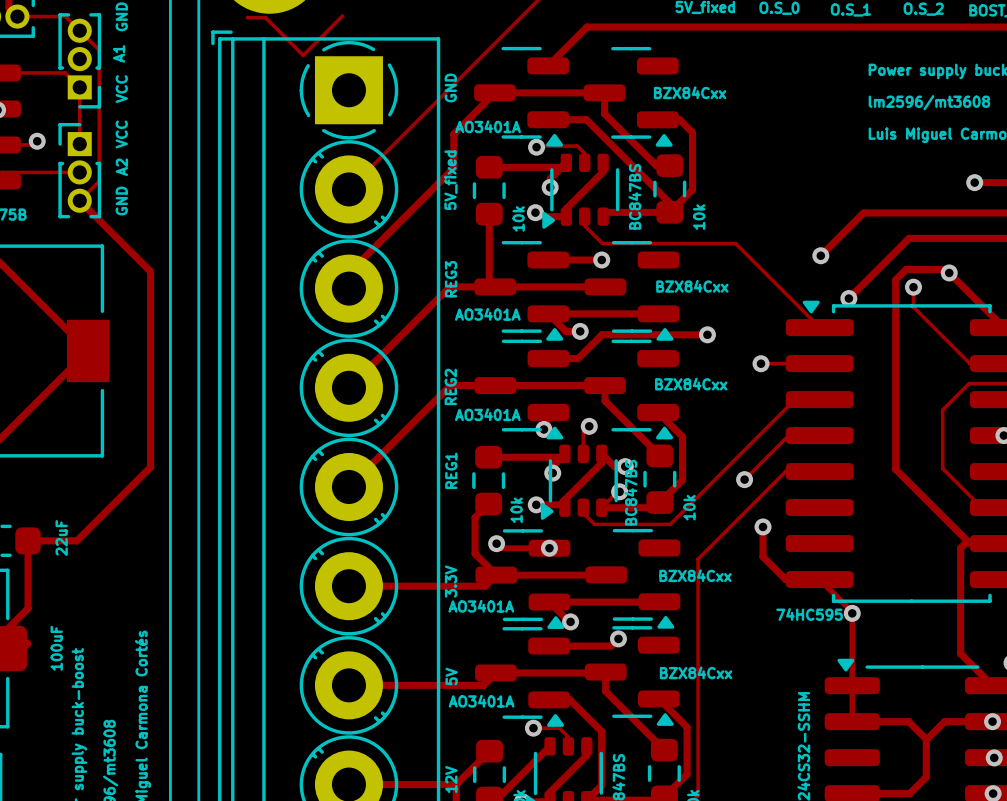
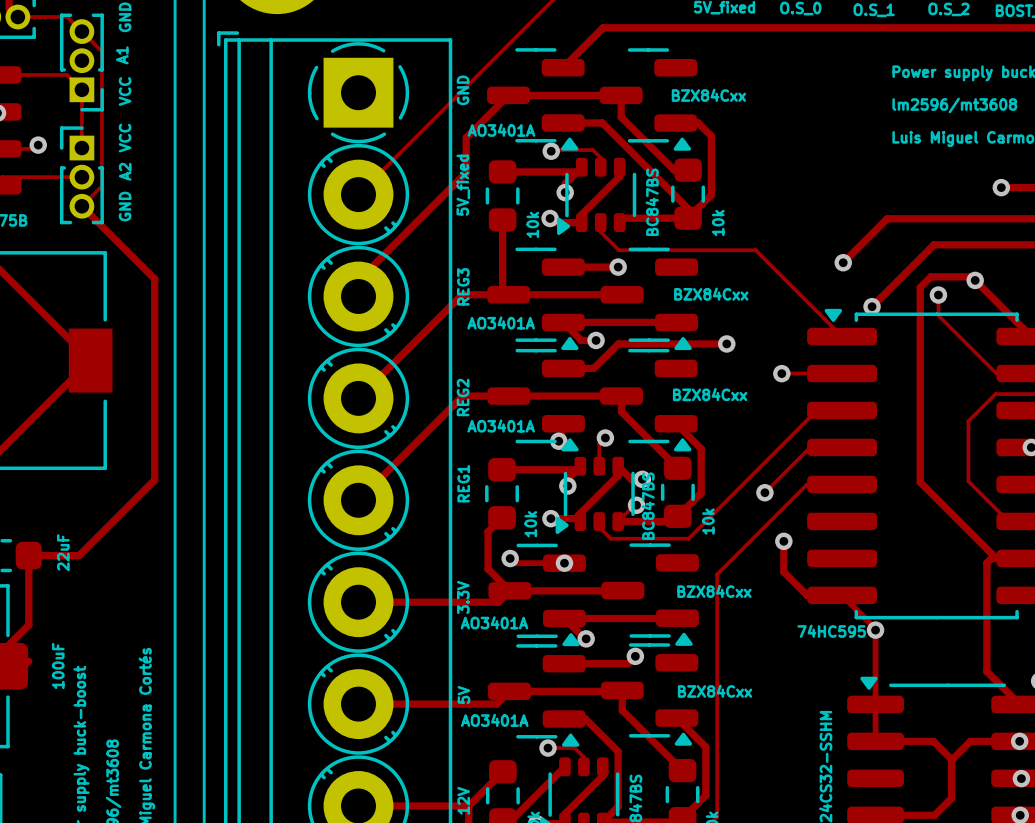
track: (342, 15) (303, 55) (265, 17) (247, 17) -> none

